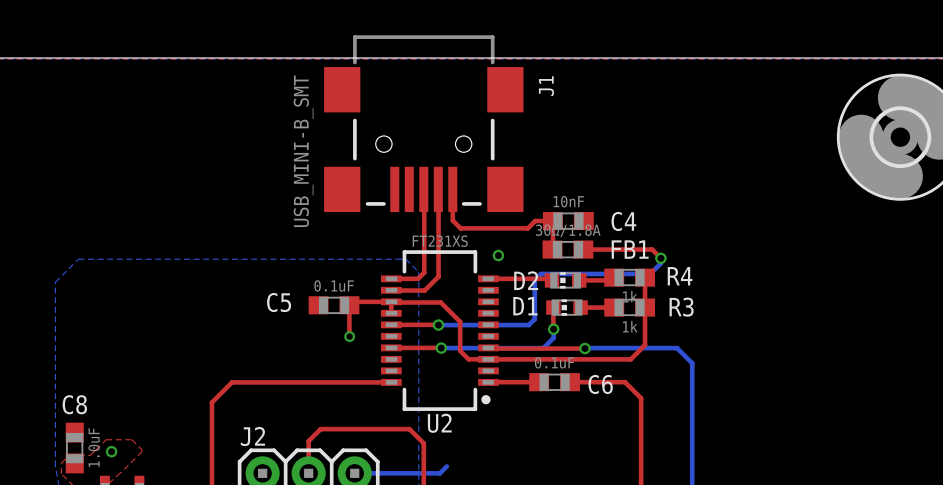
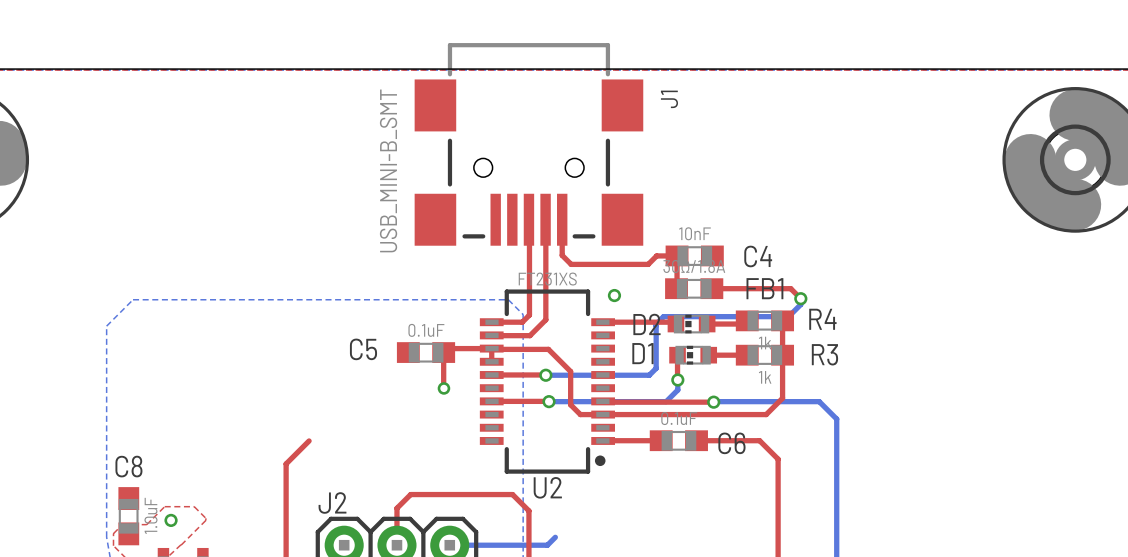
top track: (232, 382) (391, 382) -> none

